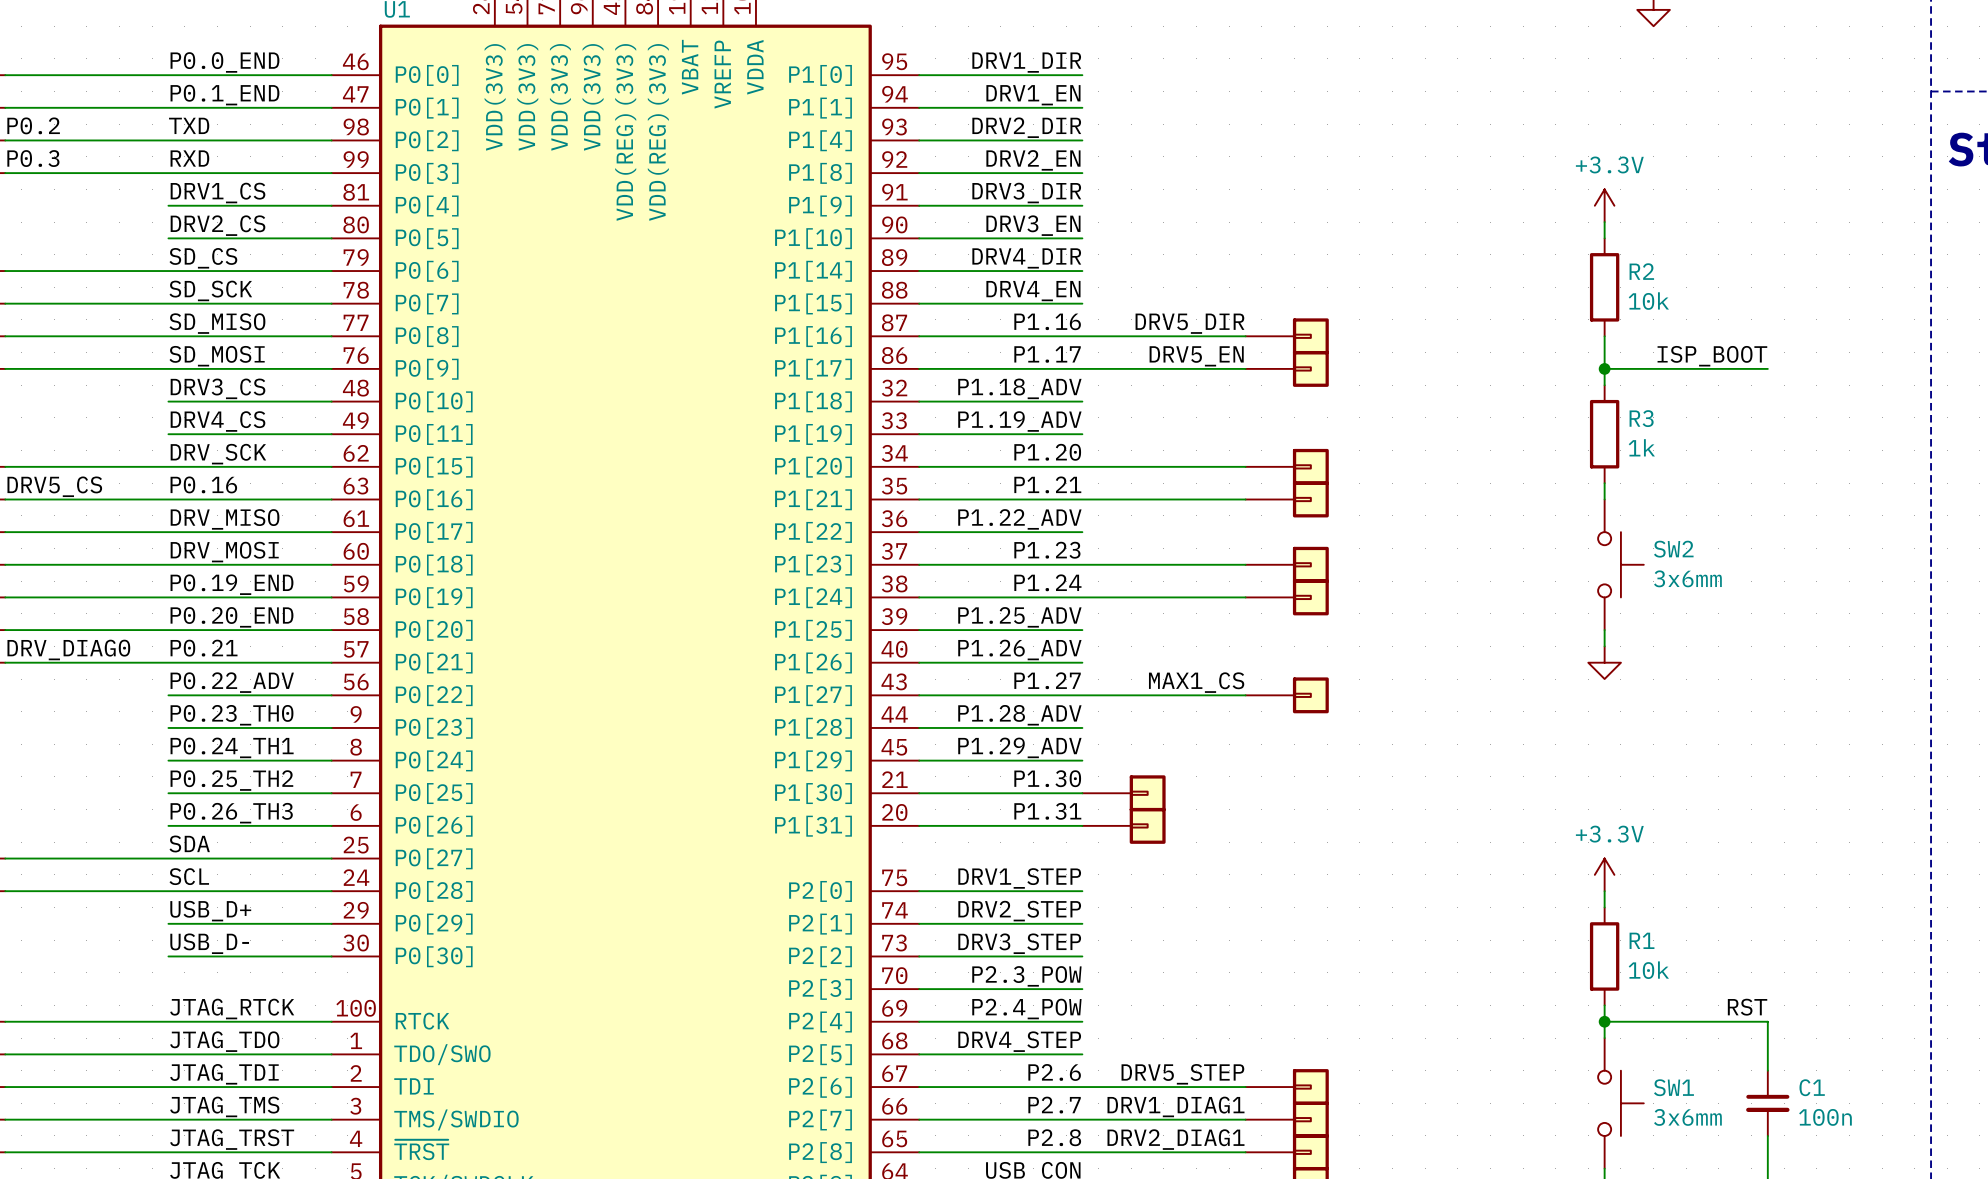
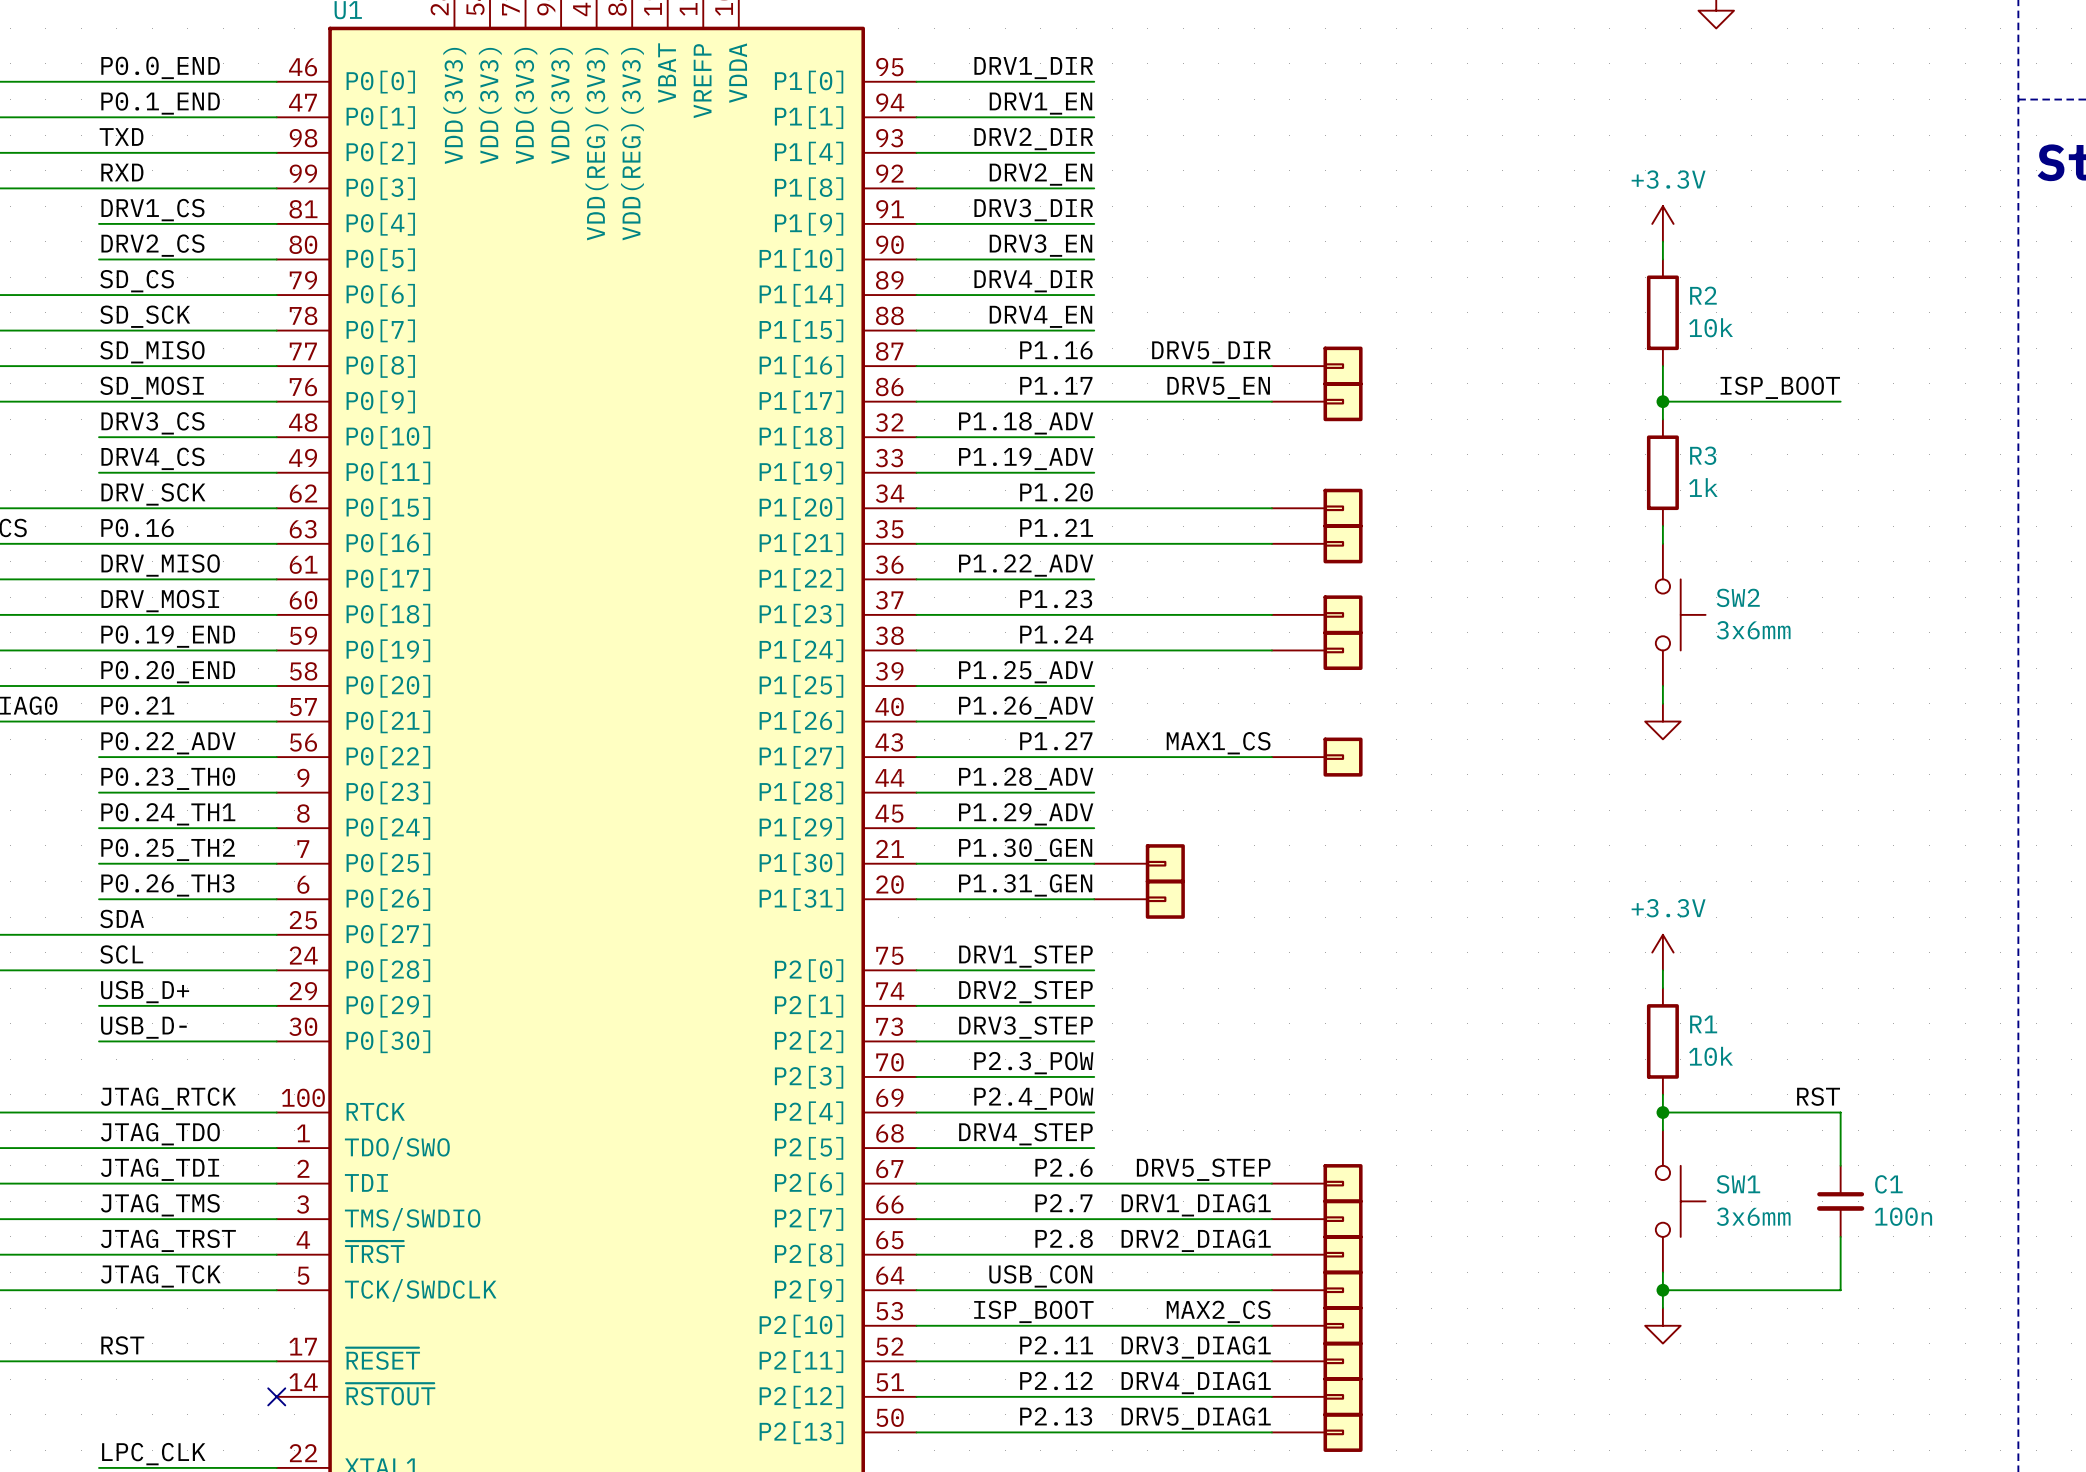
label: P1.30 (1047, 778) -> P1.30_GEN (1025, 849)
label: P1.31 (1047, 811) -> P1.31_GEN (1025, 885)

